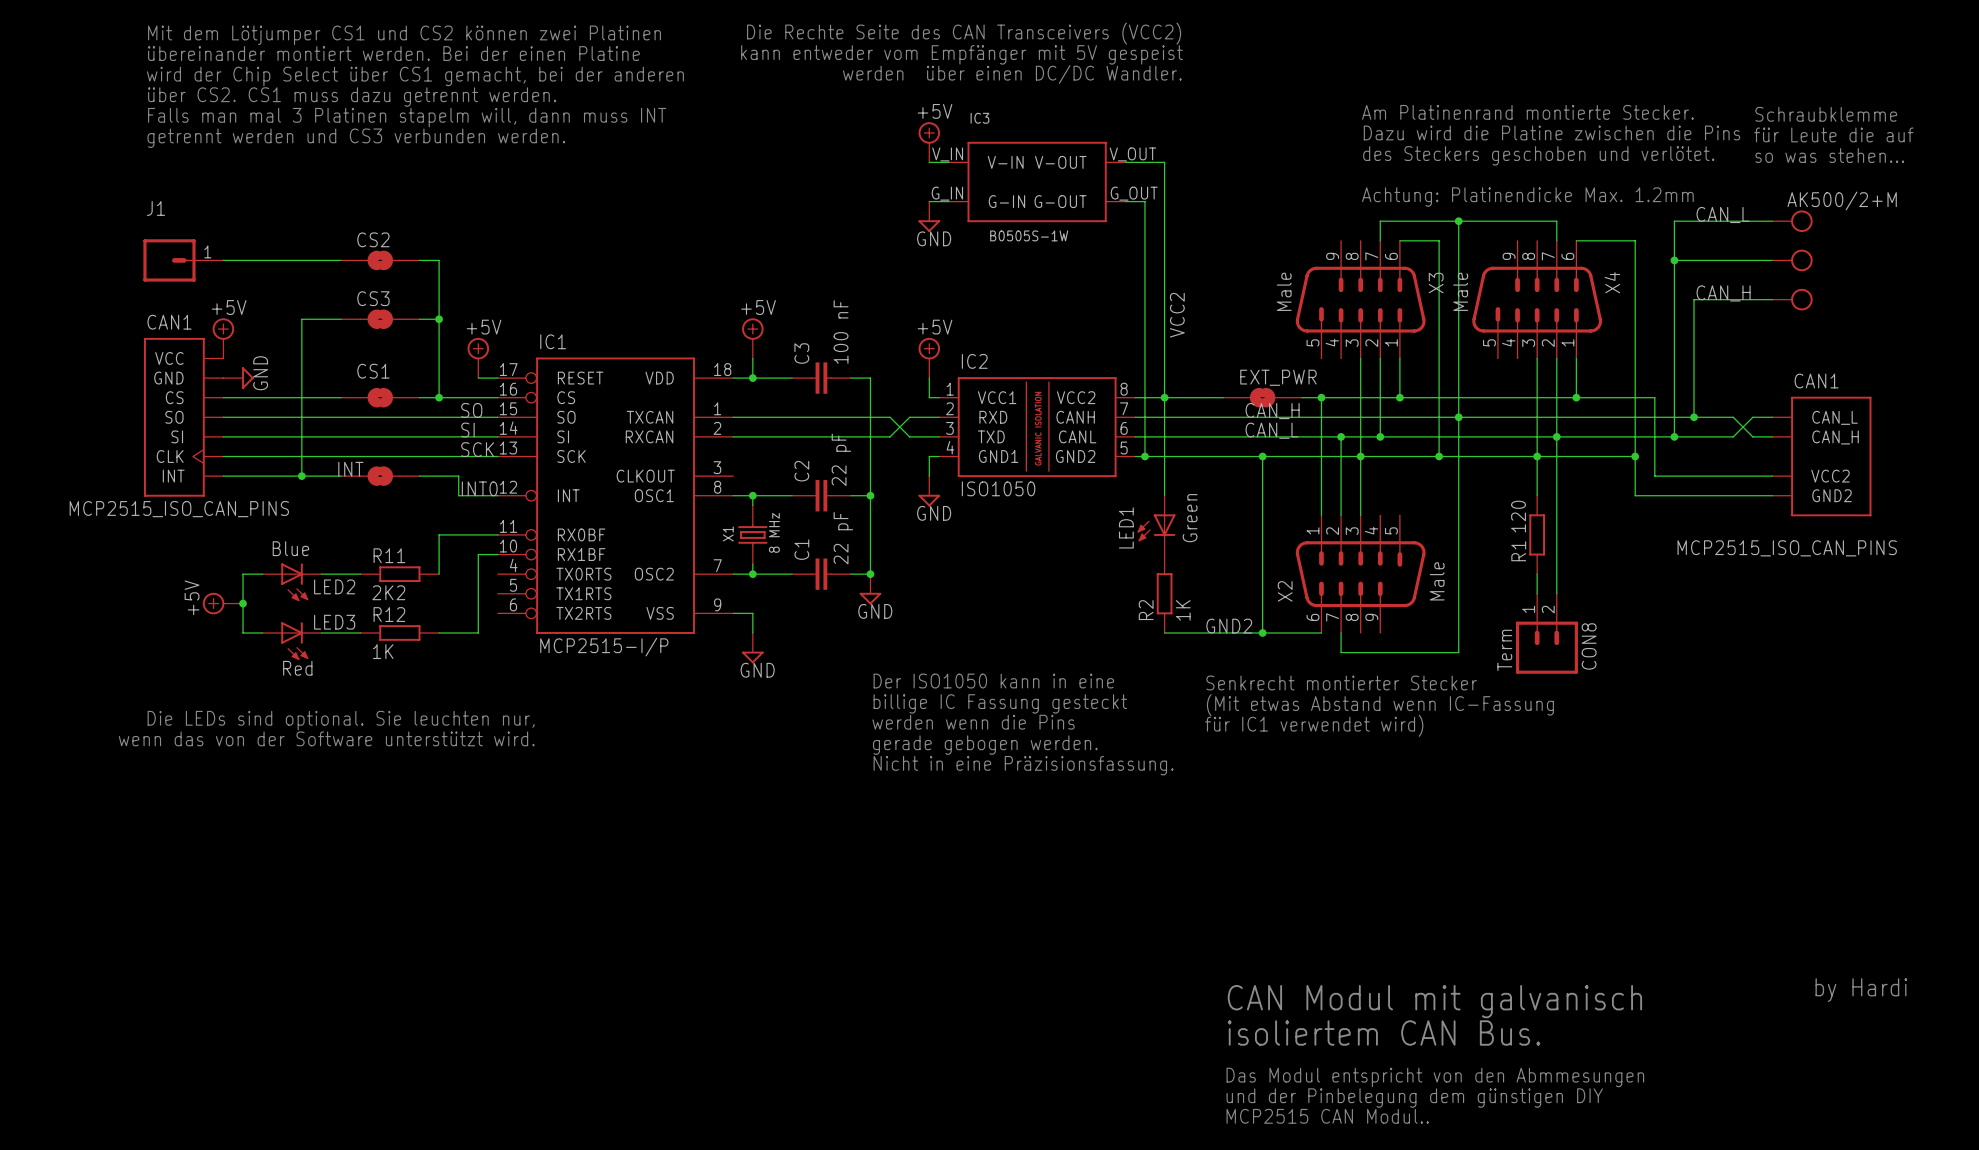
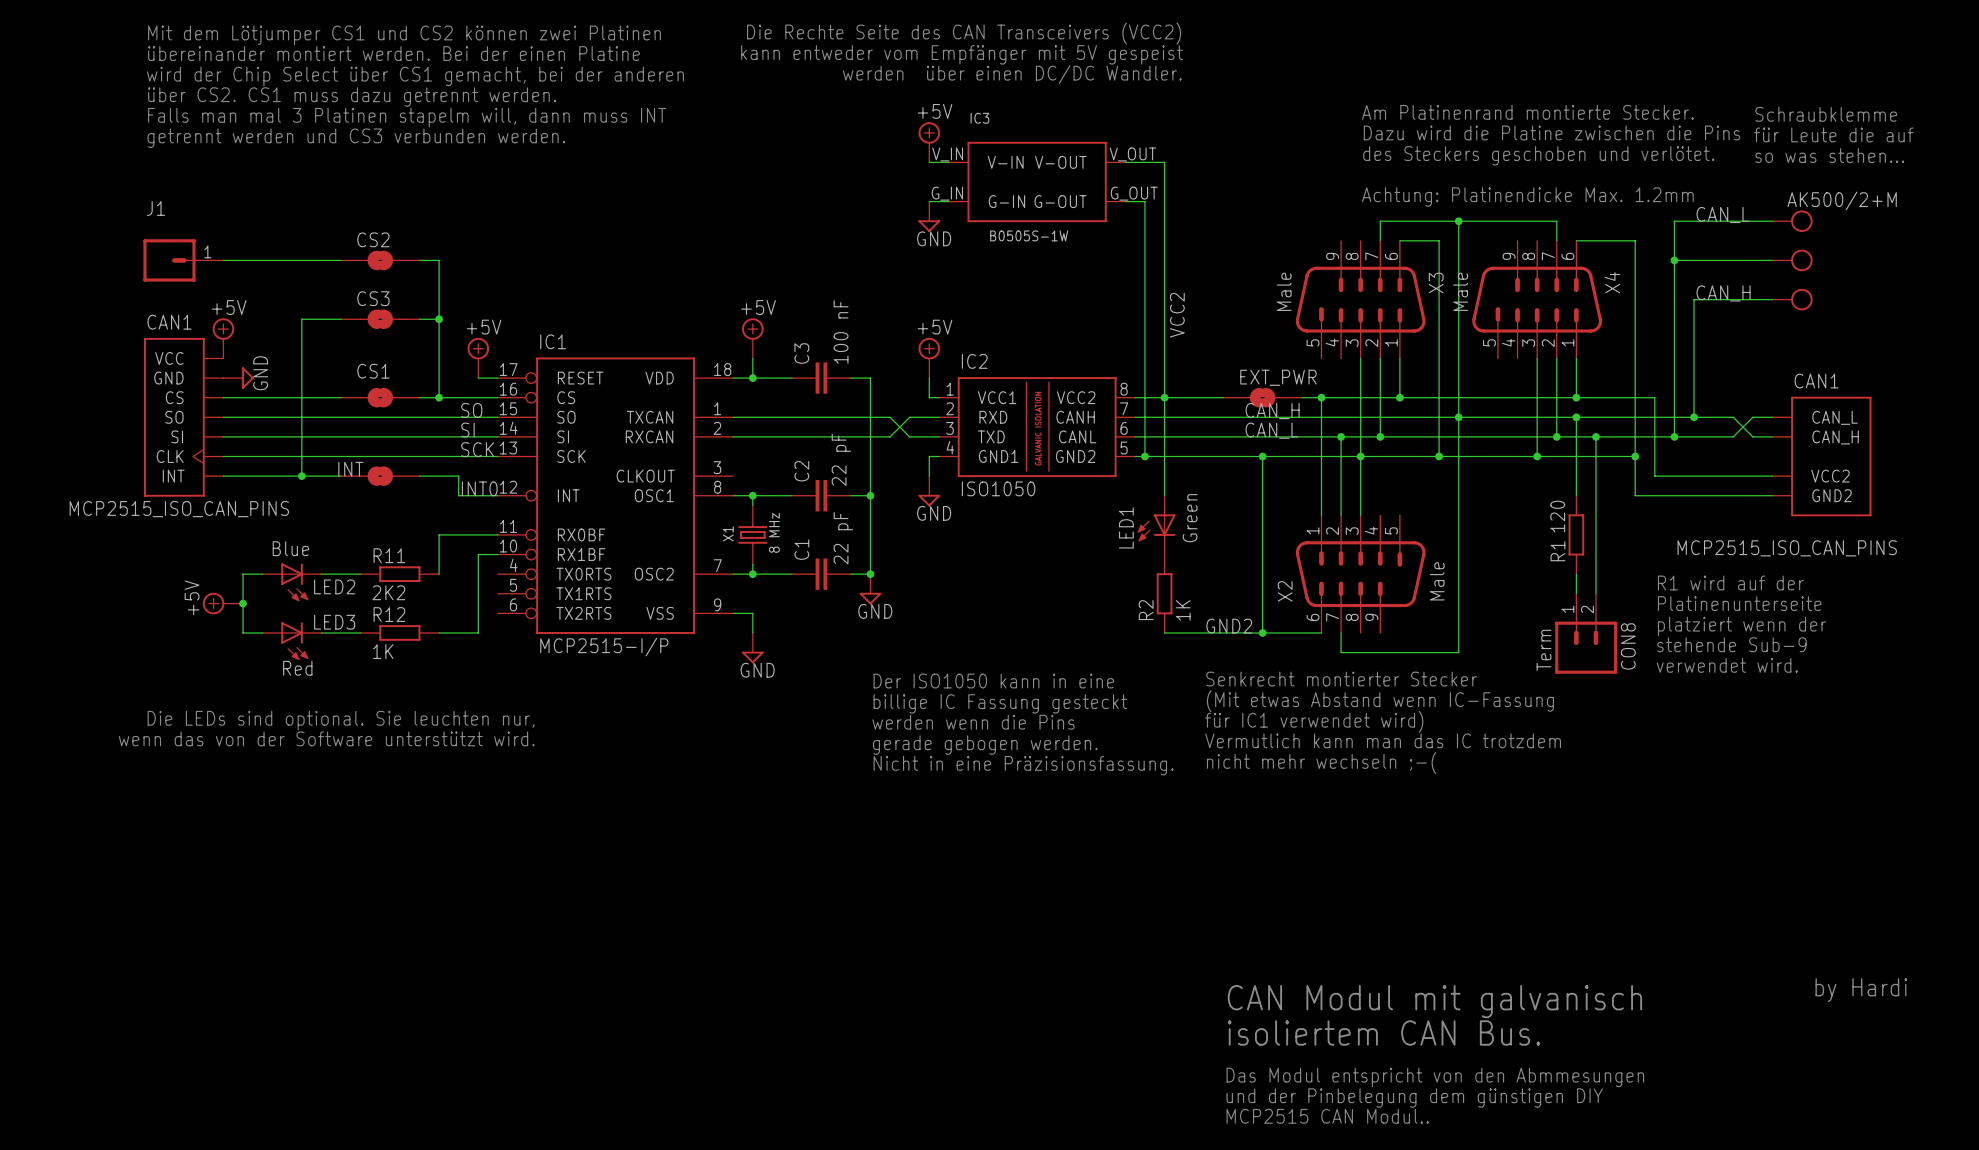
wire: none -> (1576, 417) (1576, 495)
junction: none -> (1576, 417)
wire: (1556, 436) (1556, 593) -> (1595, 436) (1595, 593)
junction: none -> (1595, 436)
wire: (1537, 456) (1537, 495) -> none
R1 position: (1537, 534) -> (1576, 534)
wire: (1537, 574) (1537, 593) -> (1576, 574) (1576, 593)
text: none -> R1 wird auf der (1730, 582)
text: none -> Platinenunterseite (1739, 603)
text: none -> platziert wenn der (1742, 626)
CON8 position: (1546, 633) -> (1586, 633)
text: none -> stehende Sub-9 (1732, 644)
text: none -> verwendet wird. (1727, 665)
text: none -> Senkrecht montierter Stecker (1341, 679)
text: Senkrecht montierter Stecker (1341, 682) -> (Mit etwas Abstand wenn IC-Fassung (1380, 701)
text: (Mit etwas Abstand wenn IC-Fassung (1380, 705) -> für IC1 verwendet wird) (1314, 721)
text: für IC1 verwendet wird) (1314, 725) -> Vermutlich kann man das IC trotzdem (1383, 740)
text: none -> nicht mehr wechseln ;-( (1321, 763)

